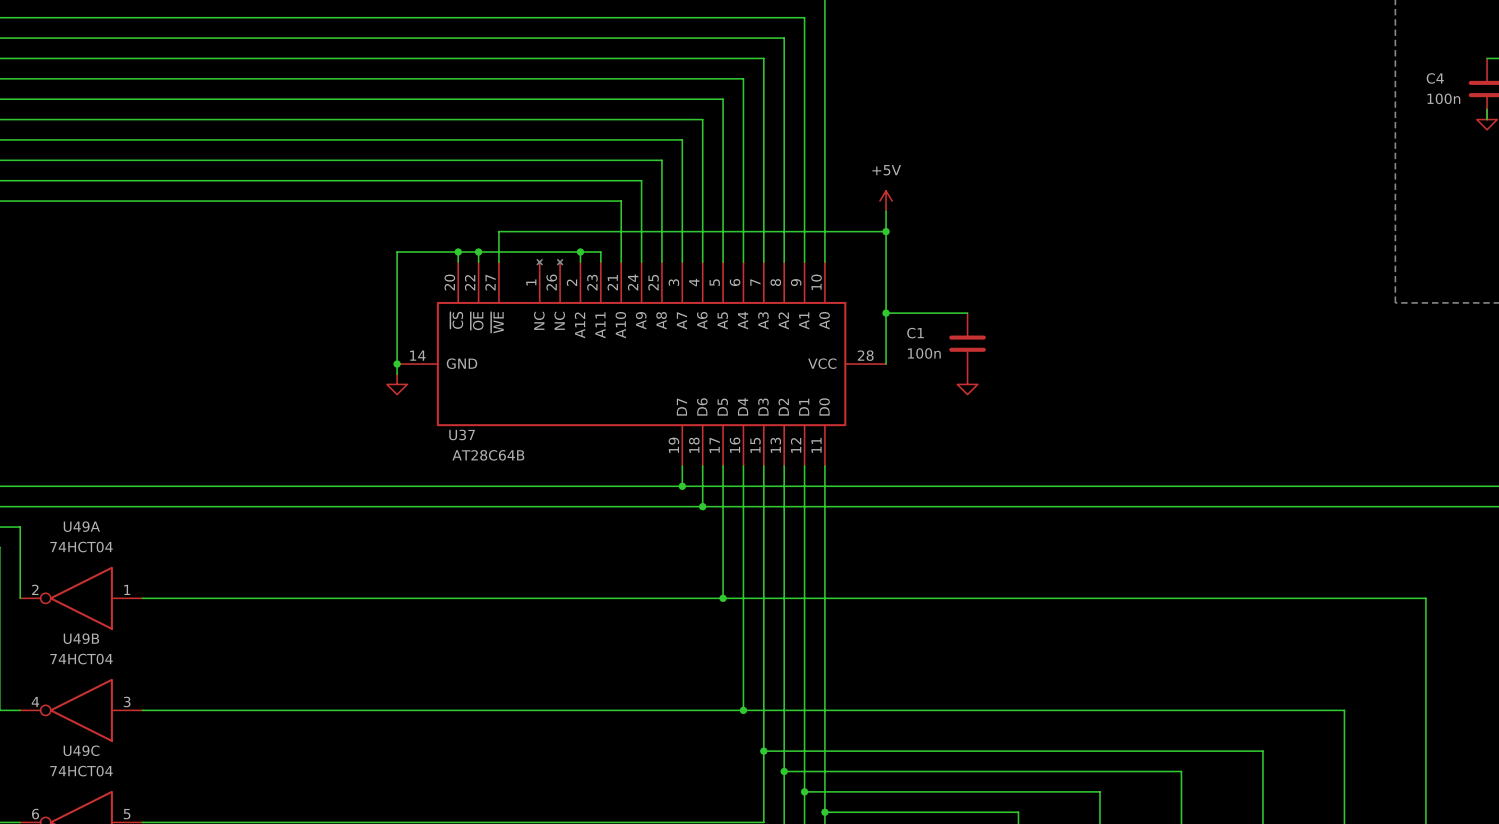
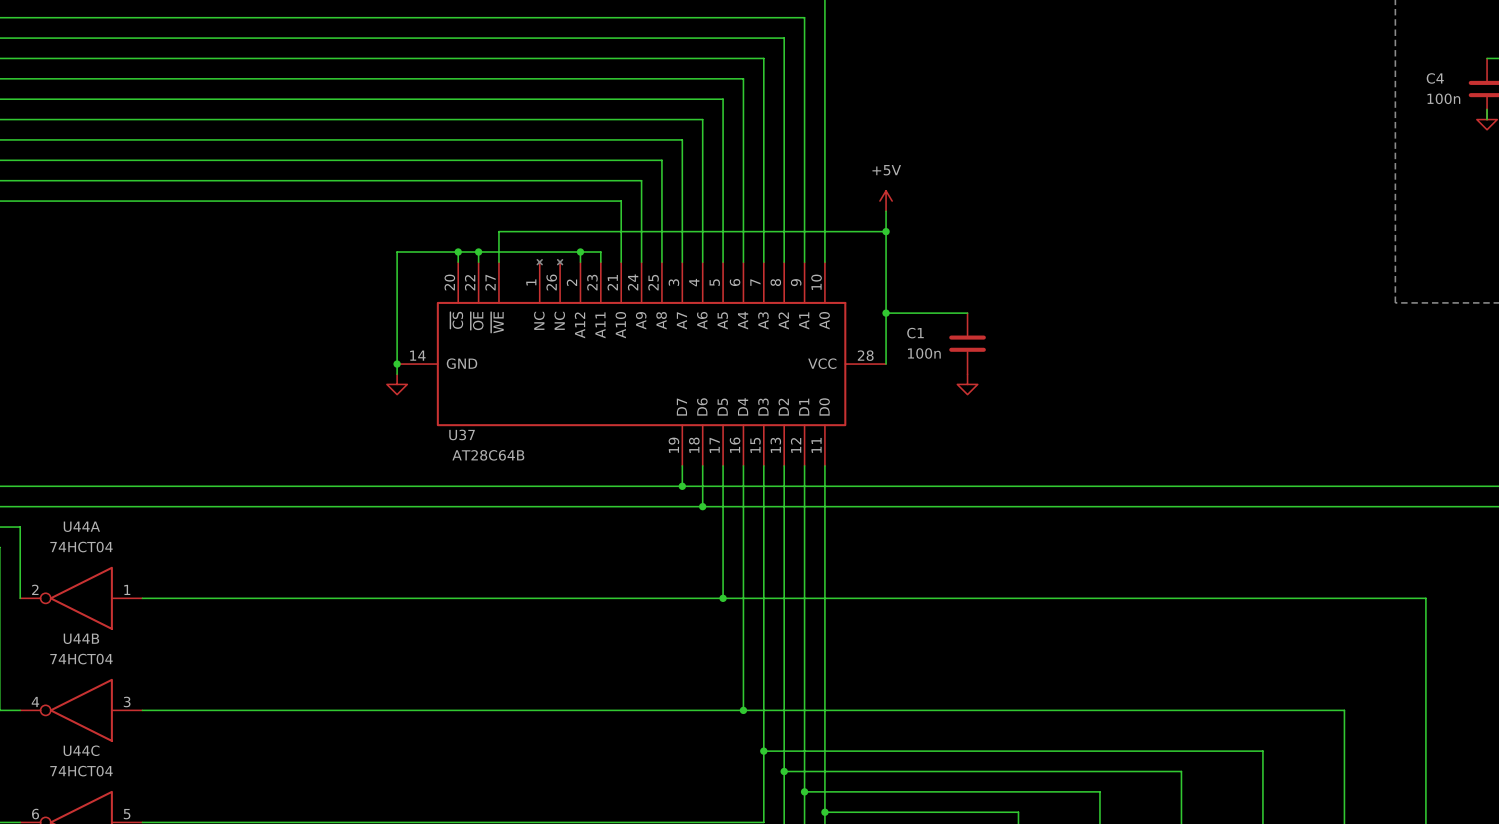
U49A name: U49A (81, 526) -> U44A (81, 526)
U49B name: U49B (81, 638) -> U44B (81, 638)
U49C name: U49C (81, 750) -> U44C (81, 750)

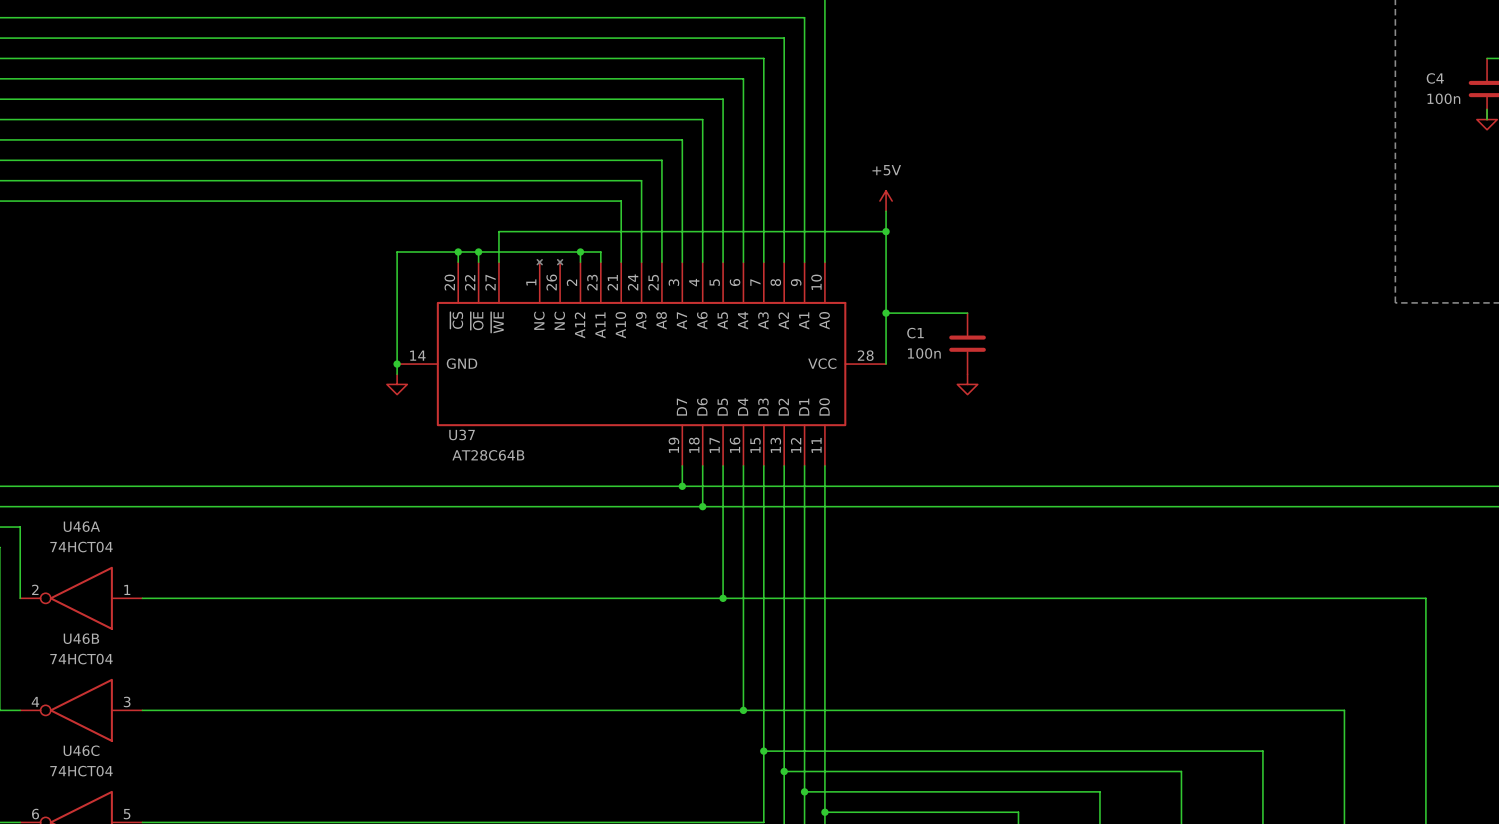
U44A name: U44A (81, 526) -> U46A (81, 526)
U44B name: U44B (81, 638) -> U46B (81, 638)
U44C name: U44C (81, 750) -> U46C (81, 750)

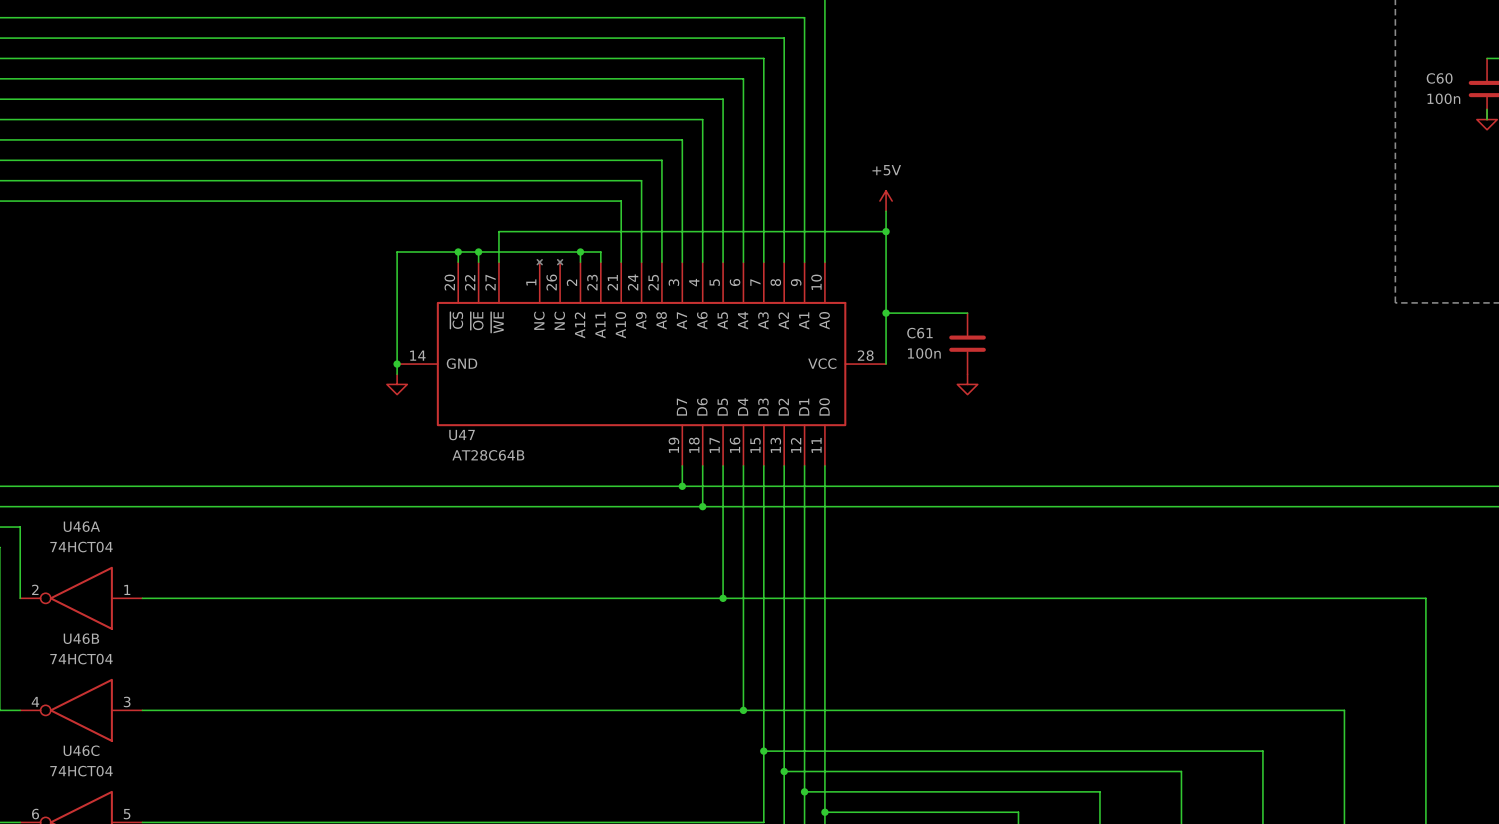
C4 name: C4 (1435, 78) -> C60 (1439, 78)
C1 name: C1 (915, 333) -> C61 (919, 333)
U37 name: U37 (462, 434) -> U47 (462, 435)

